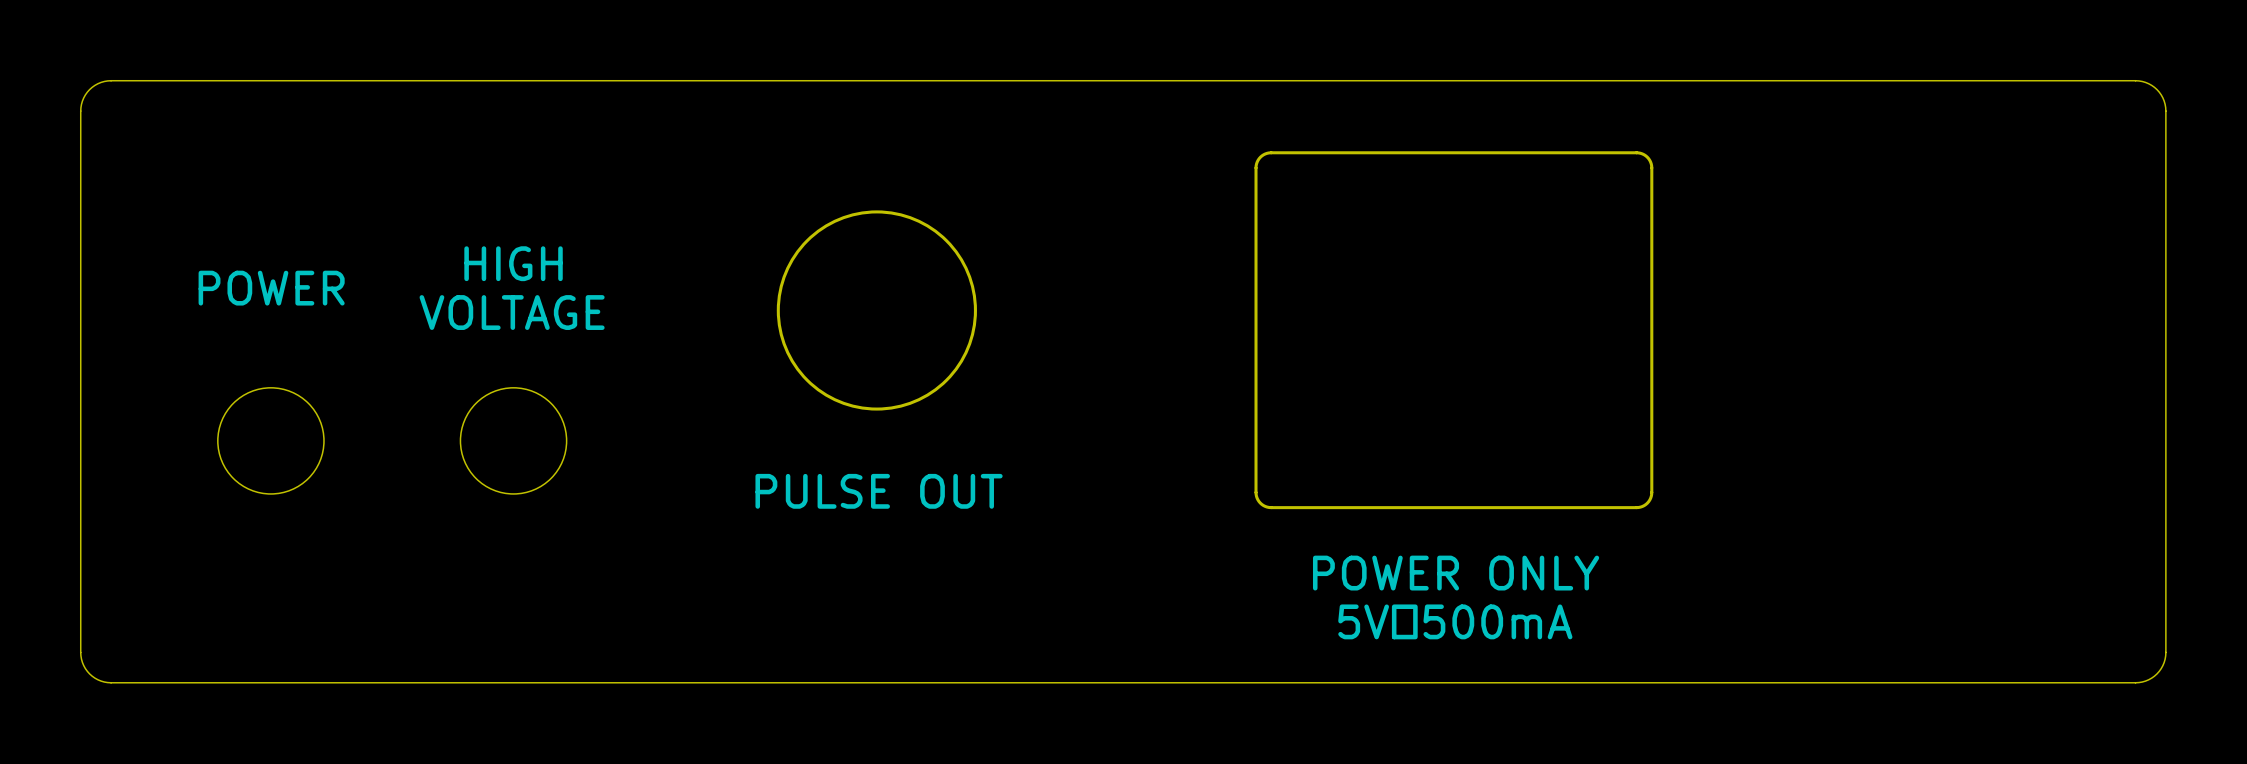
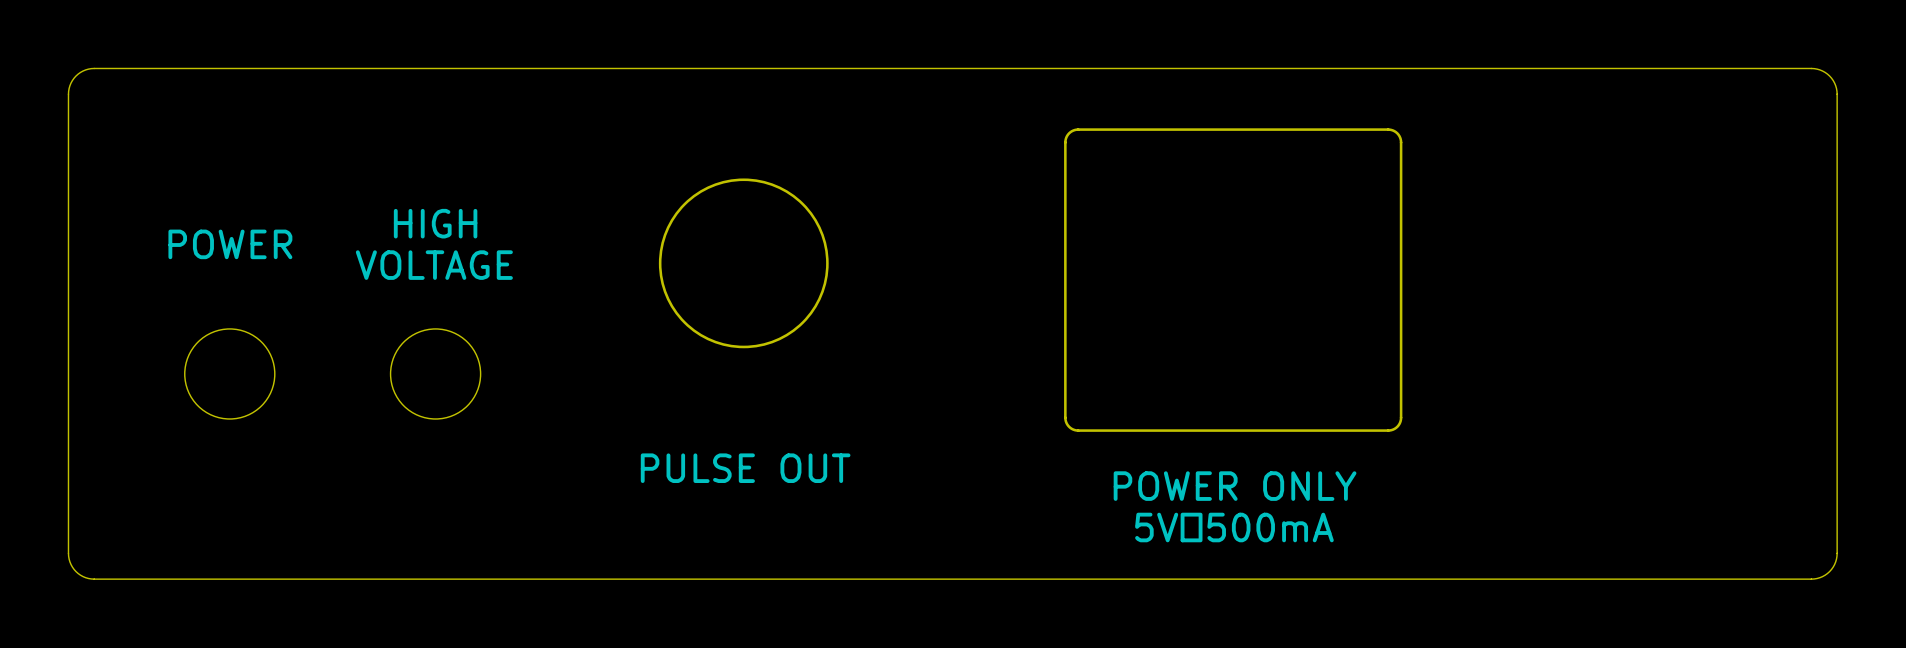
text position: PULSE OUT (879, 491) -> PULSE OUT (745, 468)

